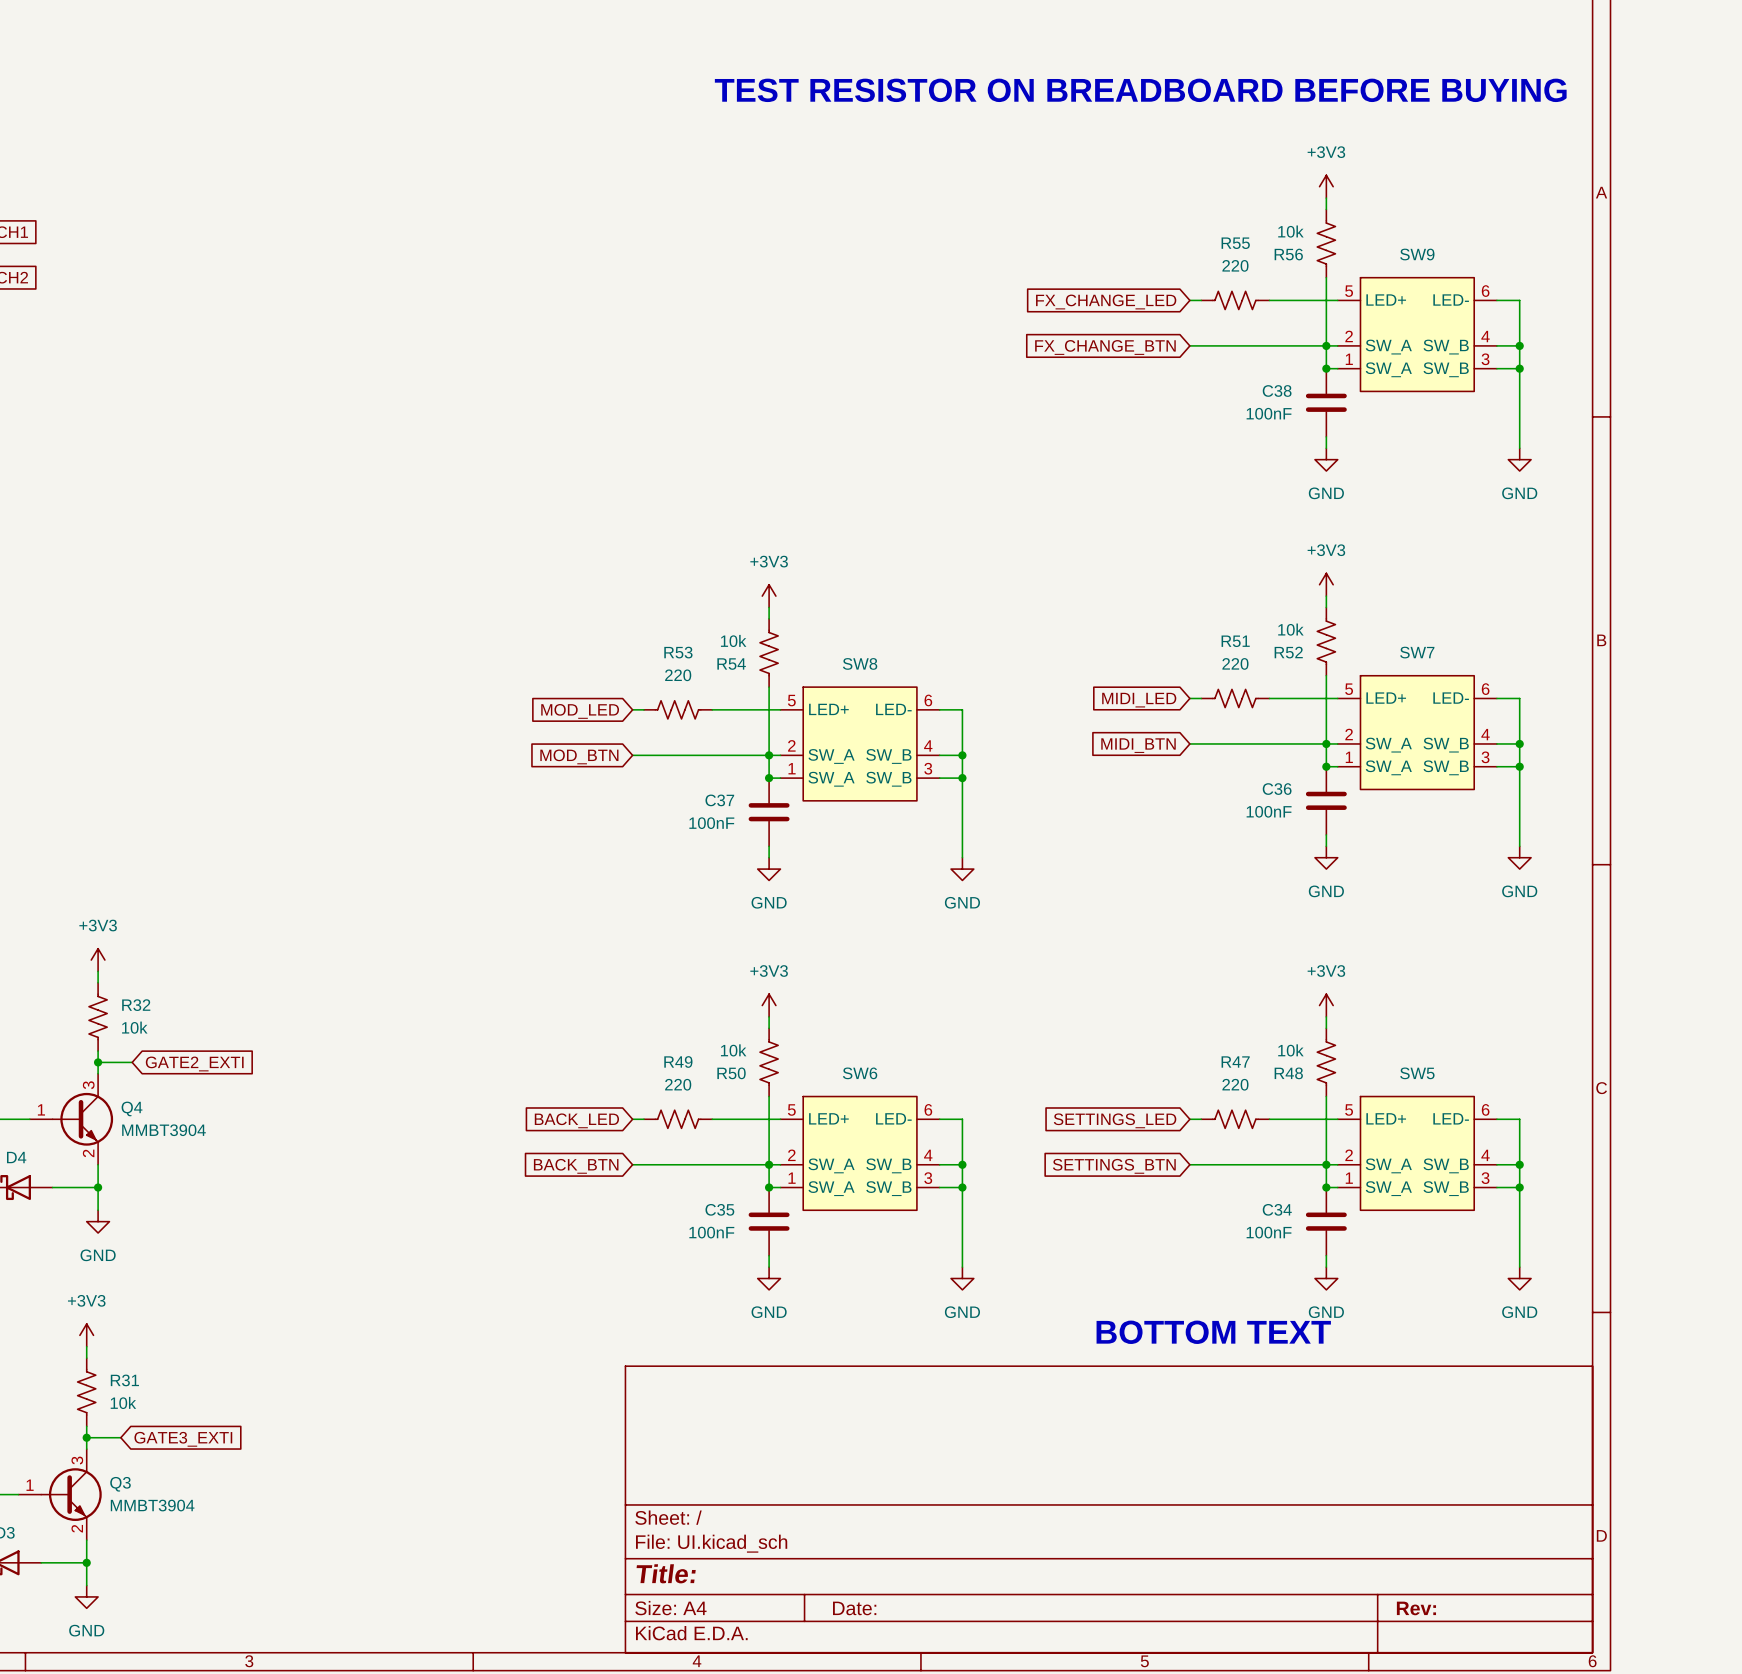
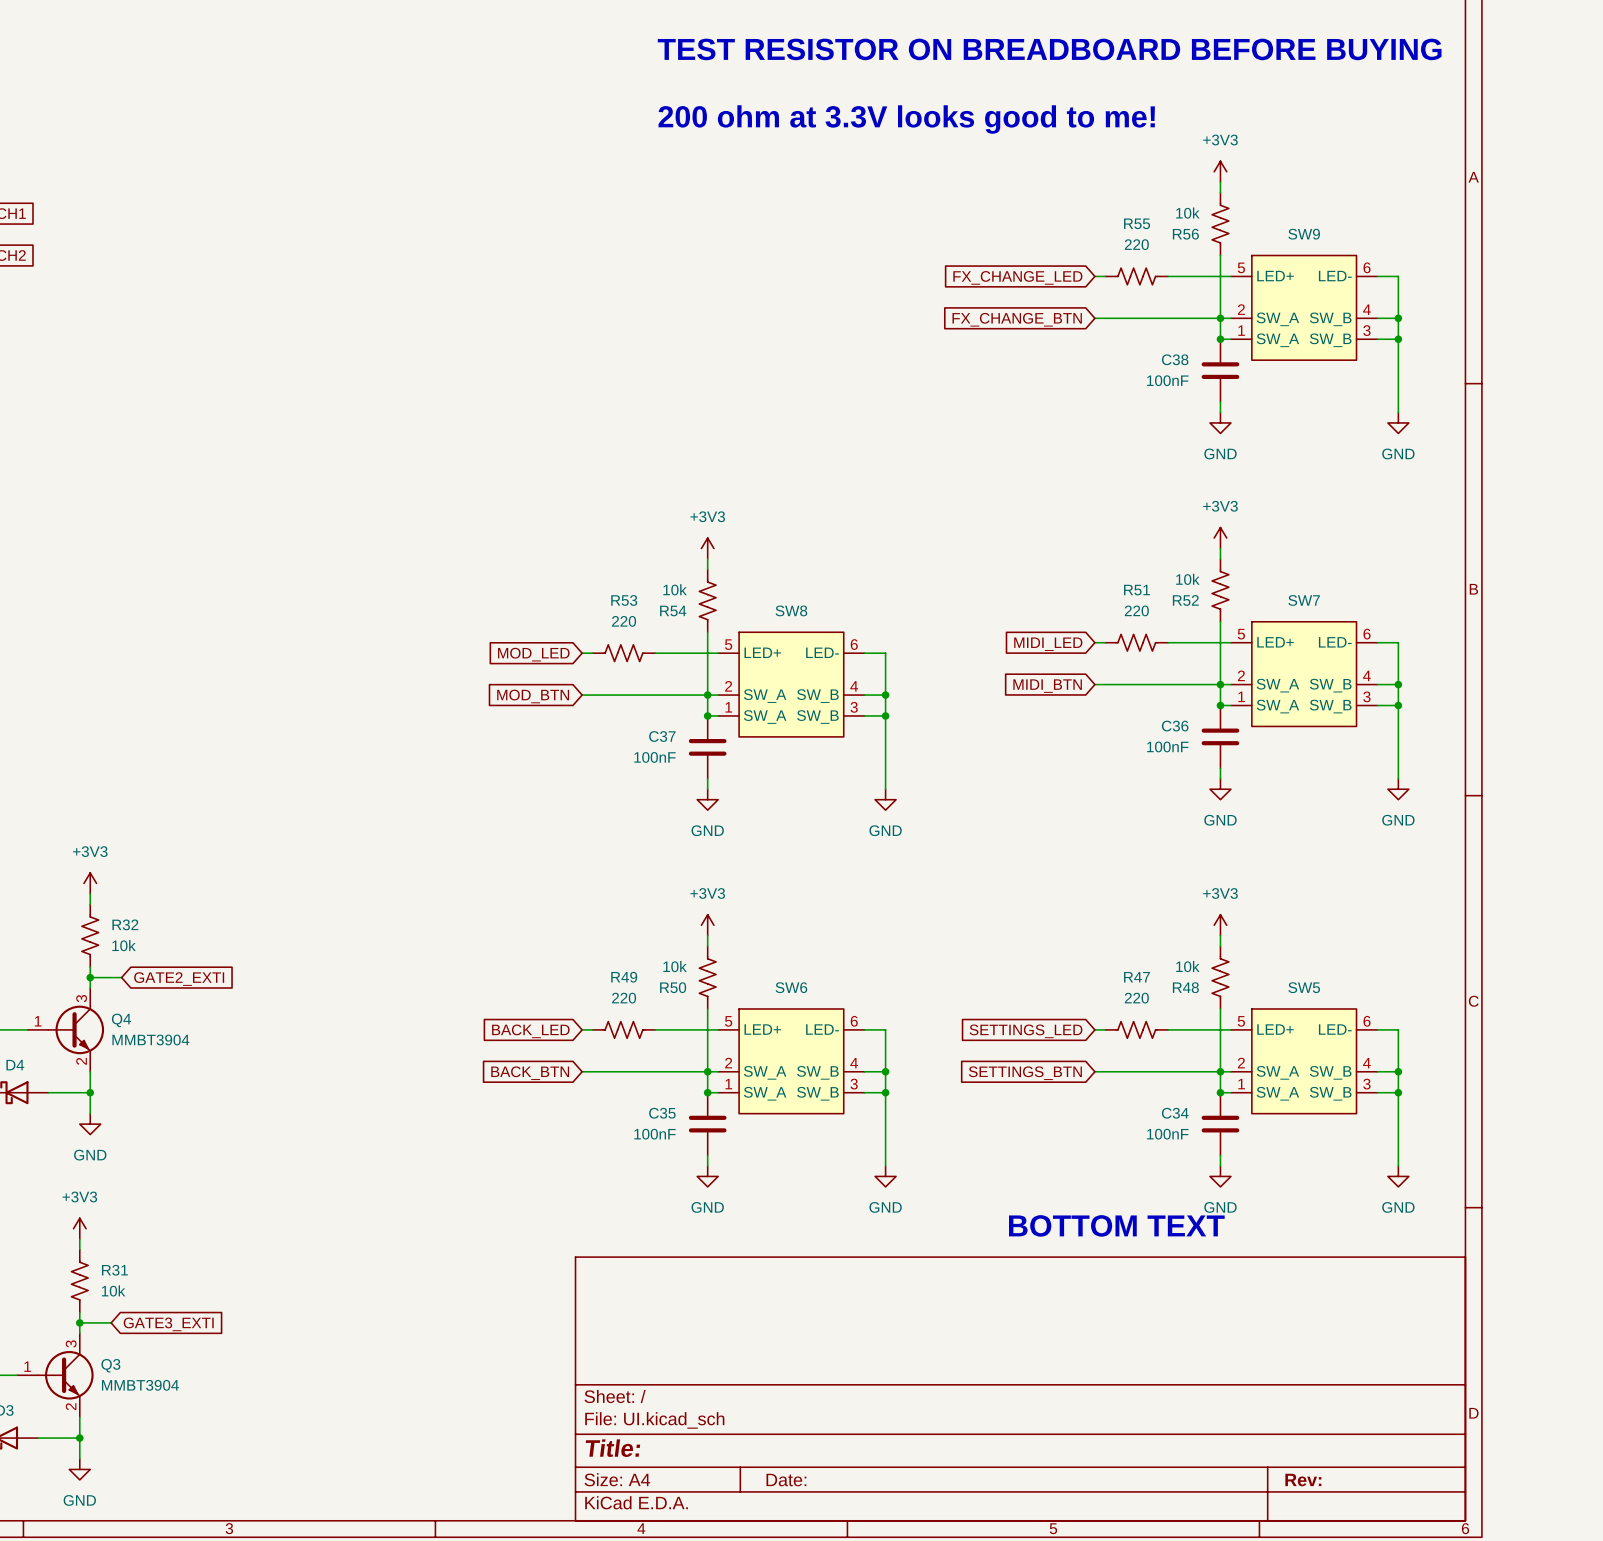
text position: TEST RESISTOR ON BREADBOARD BEFORE BUYING (1140, 90) -> TEST RESISTOR ON BREADBOARD BEFORE BUYING (1049, 49)
text: none -> 200 ohm at 3.3V looks good to me! (906, 119)

